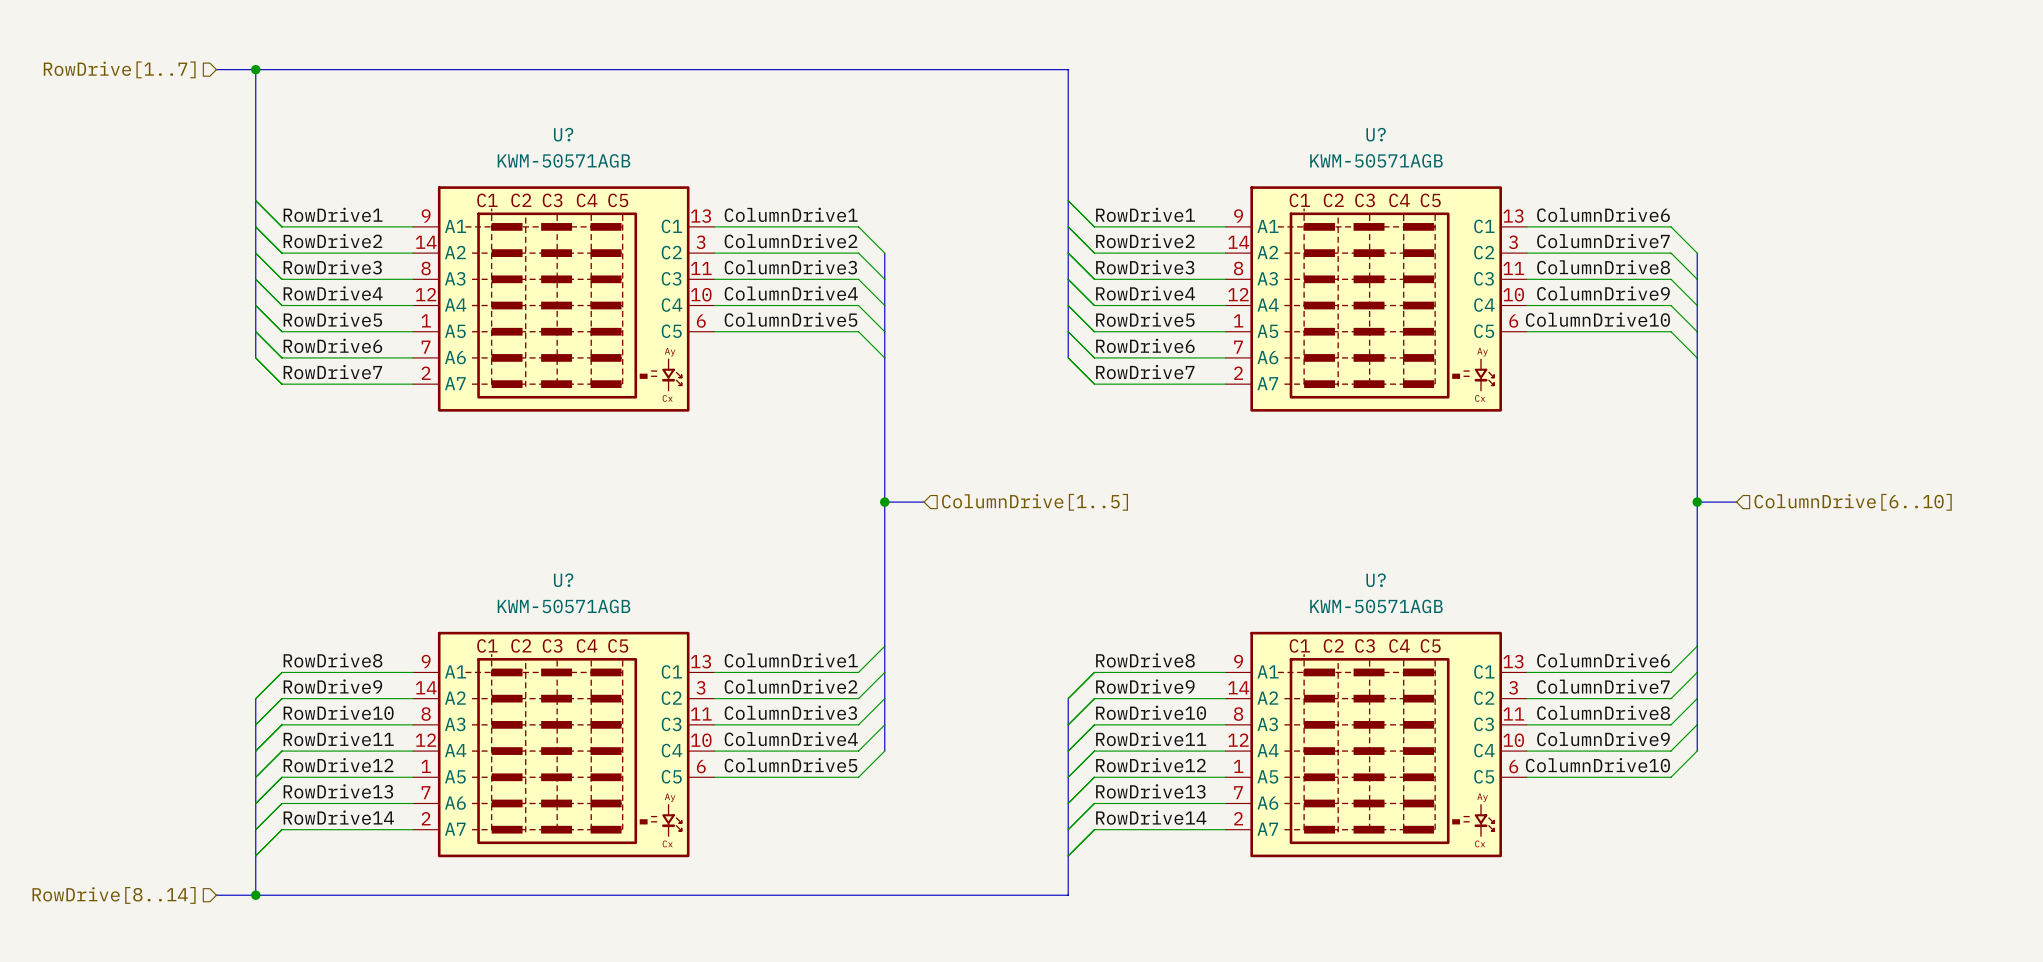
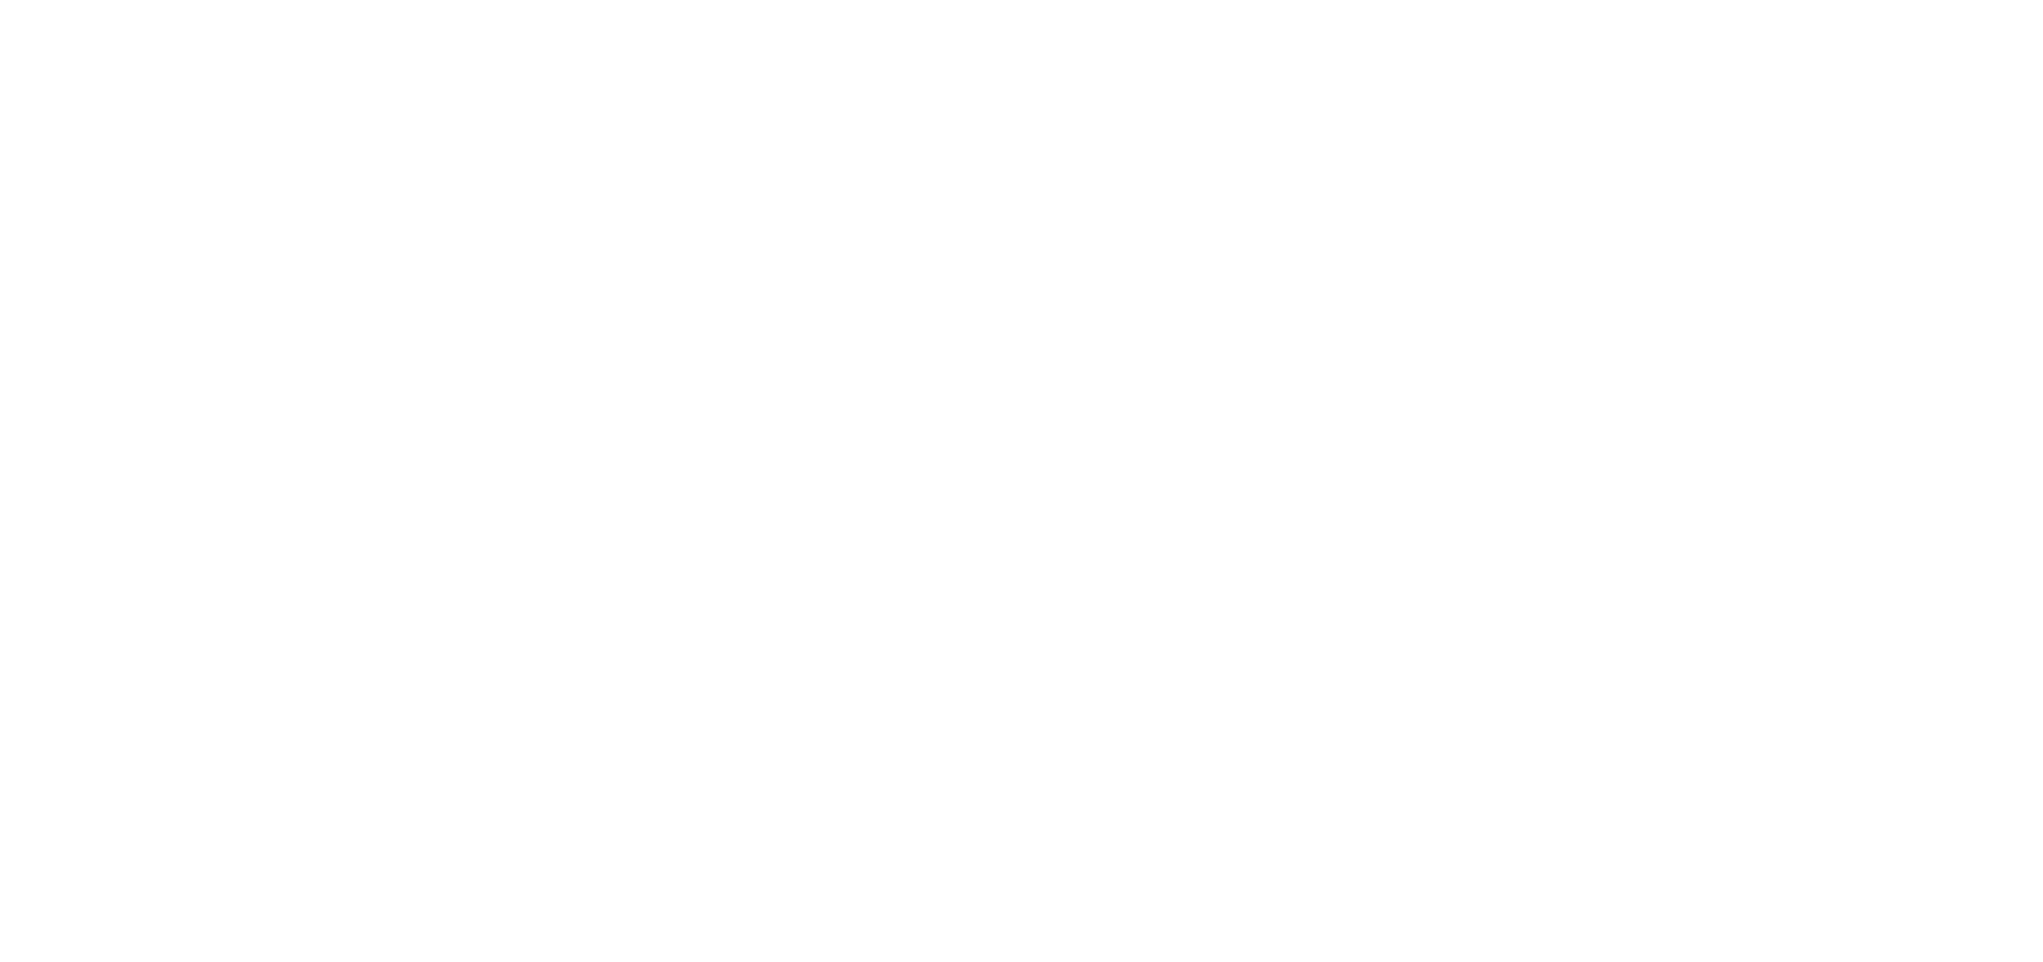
hierarchical label: RowDrive[1..7] (119, 69) -> none
bus: (216, 69) (1068, 69) (1068, 357) -> none
bus: (255, 69) (255, 357) -> none
junction: (255, 69) -> none
wire: (255, 200) (281, 226) (413, 226) -> none
wire: (1068, 200) (1094, 226) (1225, 226) -> none
label: RowDrive1 (333, 214) -> none
label: ColumnDrive1 (791, 214) -> none
label: RowDrive1 (1145, 214) -> none
label: ColumnDrive6 (1603, 214) -> none
wire: (255, 226) (281, 253) (413, 253) -> none
wire: (714, 226) (858, 226) (884, 253) -> none
wire: (1068, 226) (1094, 253) (1225, 253) -> none
wire: (1526, 226) (1671, 226) (1697, 253) -> none
label: RowDrive2 (332, 241) -> none
label: ColumnDrive2 (791, 241) -> none
label: RowDrive2 (1145, 241) -> none
label: ColumnDrive7 (1603, 241) -> none
wire: (255, 253) (281, 279) (413, 279) -> none
wire: (714, 253) (858, 253) (884, 279) -> none
bus: (884, 253) (884, 751) -> none
wire: (1068, 253) (1094, 279) (1225, 279) -> none
wire: (1526, 253) (1671, 253) (1697, 279) -> none
bus: (1697, 253) (1697, 751) -> none
label: RowDrive3 (332, 267) -> none
label: ColumnDrive3 (790, 267) -> none
label: RowDrive3 (1145, 267) -> none
label: ColumnDrive8 (1603, 267) -> none
wire: (255, 279) (281, 305) (413, 305) -> none
wire: (714, 279) (858, 279) (884, 305) -> none
wire: (1068, 279) (1094, 305) (1225, 305) -> none
wire: (1526, 279) (1671, 279) (1697, 305) -> none
label: RowDrive4 (333, 293) -> none
label: ColumnDrive4 (791, 293) -> none
label: RowDrive4 (1145, 293) -> none
label: ColumnDrive9 (1603, 293) -> none
U?: (563, 298) -> none
U?: (1376, 298) -> none
wire: (255, 305) (281, 331) (413, 331) -> none
wire: (714, 305) (858, 305) (884, 331) -> none
wire: (1068, 305) (1094, 331) (1225, 331) -> none
wire: (1526, 305) (1671, 305) (1697, 331) -> none
label: RowDrive5 (332, 319) -> none
label: ColumnDrive5 (790, 319) -> none
label: RowDrive5 (1145, 319) -> none
label: ColumnDrive10 (1597, 319) -> none
wire: (255, 331) (281, 357) (413, 357) -> none
wire: (714, 331) (858, 331) (884, 357) -> none
wire: (1068, 331) (1094, 357) (1225, 357) -> none
wire: (1526, 331) (1671, 331) (1697, 357) -> none
label: RowDrive6 (332, 345) -> none
label: RowDrive6 (1145, 345) -> none
wire: (255, 357) (281, 384) (413, 384) -> none
wire: (1068, 357) (1094, 384) (1225, 384) -> none
label: RowDrive7 (332, 372) -> none
label: RowDrive7 (1145, 372) -> none
bus: (884, 502) (924, 502) -> none
junction: (884, 502) -> none
hierarchical label: ColumnDrive[1..5] (1035, 502) -> none
bus: (1697, 502) (1736, 502) -> none
junction: (1697, 502) -> none
hierarchical label: ColumnDrive[6..10] (1853, 502) -> none
wire: (884, 646) (858, 672) (714, 672) -> none
wire: (1697, 646) (1671, 672) (1526, 672) -> none
label: RowDrive8 (332, 660) -> none
label: ColumnDrive1 (791, 660) -> none
label: RowDrive8 (1145, 660) -> none
label: ColumnDrive6 (1603, 660) -> none
wire: (413, 672) (281, 672) (255, 698) -> none
wire: (884, 672) (858, 698) (714, 698) -> none
wire: (1225, 672) (1094, 672) (1068, 698) -> none
wire: (1697, 672) (1671, 698) (1526, 698) -> none
label: RowDrive9 (332, 686) -> none
label: ColumnDrive2 (791, 686) -> none
label: RowDrive9 (1145, 686) -> none
label: ColumnDrive7 (1603, 686) -> none
bus: (255, 698) (255, 895) -> none
wire: (413, 698) (281, 698) (255, 724) -> none
wire: (884, 698) (858, 724) (714, 724) -> none
bus: (1068, 698) (1068, 895) (216, 895) -> none
wire: (1225, 698) (1094, 698) (1068, 724) -> none
wire: (1697, 698) (1671, 724) (1526, 724) -> none
label: RowDrive10 (338, 712) -> none
label: ColumnDrive3 (790, 712) -> none
label: RowDrive10 (1151, 712) -> none
label: ColumnDrive8 (1603, 712) -> none
wire: (413, 724) (281, 724) (255, 751) -> none
wire: (884, 724) (858, 751) (714, 751) -> none
wire: (1225, 724) (1094, 724) (1068, 751) -> none
wire: (1697, 724) (1671, 751) (1526, 751) -> none
label: RowDrive11 (338, 739) -> none
label: ColumnDrive4 (791, 739) -> none
label: RowDrive11 (1151, 739) -> none
label: ColumnDrive9 (1603, 739) -> none
U?: (563, 744) -> none
U?: (1376, 744) -> none
wire: (413, 751) (281, 751) (255, 777) -> none
wire: (884, 751) (858, 777) (714, 777) -> none
wire: (1225, 751) (1094, 751) (1068, 777) -> none
wire: (1697, 751) (1671, 777) (1526, 777) -> none
label: RowDrive12 (338, 765) -> none
label: ColumnDrive5 (790, 765) -> none
label: RowDrive12 (1151, 765) -> none
label: ColumnDrive10 (1597, 765) -> none
wire: (413, 777) (281, 777) (255, 803) -> none
wire: (1225, 777) (1094, 777) (1068, 803) -> none
label: RowDrive13 (338, 791) -> none
label: RowDrive13 (1150, 791) -> none
wire: (413, 803) (281, 803) (255, 829) -> none
wire: (1225, 803) (1094, 803) (1068, 829) -> none
label: RowDrive14 (338, 817) -> none
label: RowDrive14 (1151, 817) -> none
wire: (413, 829) (281, 829) (255, 855) -> none
wire: (1225, 829) (1094, 829) (1068, 855) -> none
hierarchical label: RowDrive[8..14] (114, 895) -> none
junction: (255, 895) -> none

